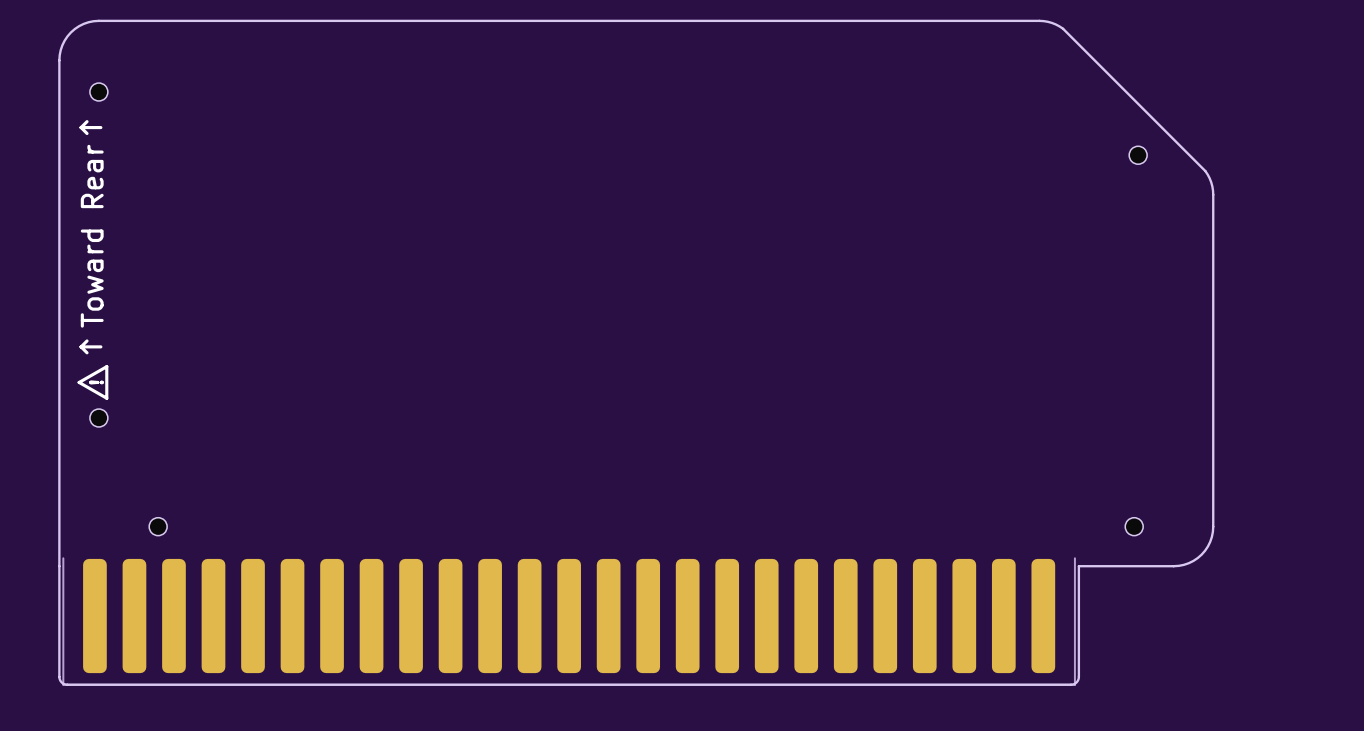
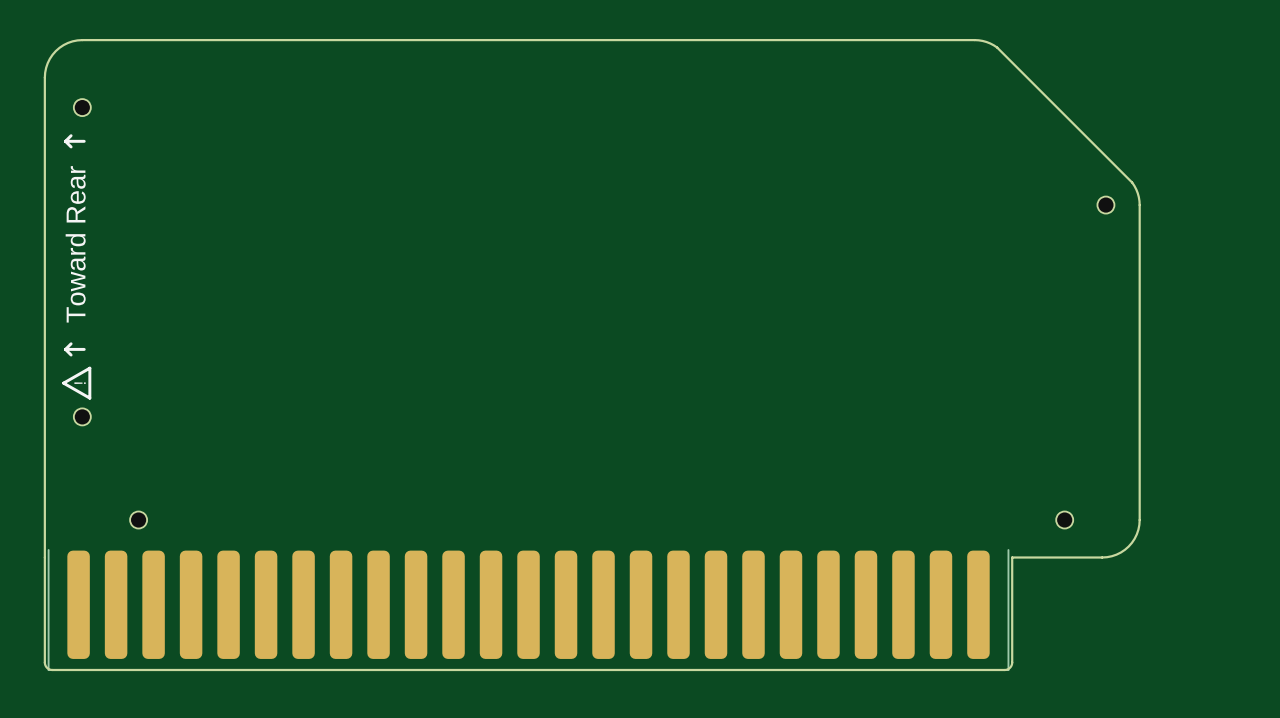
part position: (1138, 155) -> (1105, 205)

